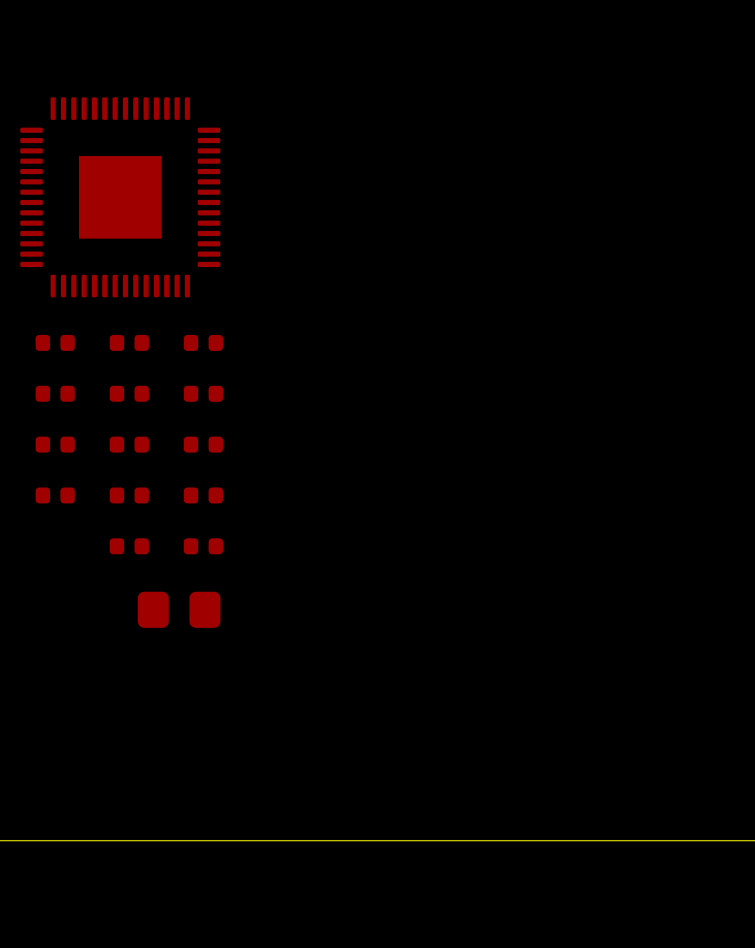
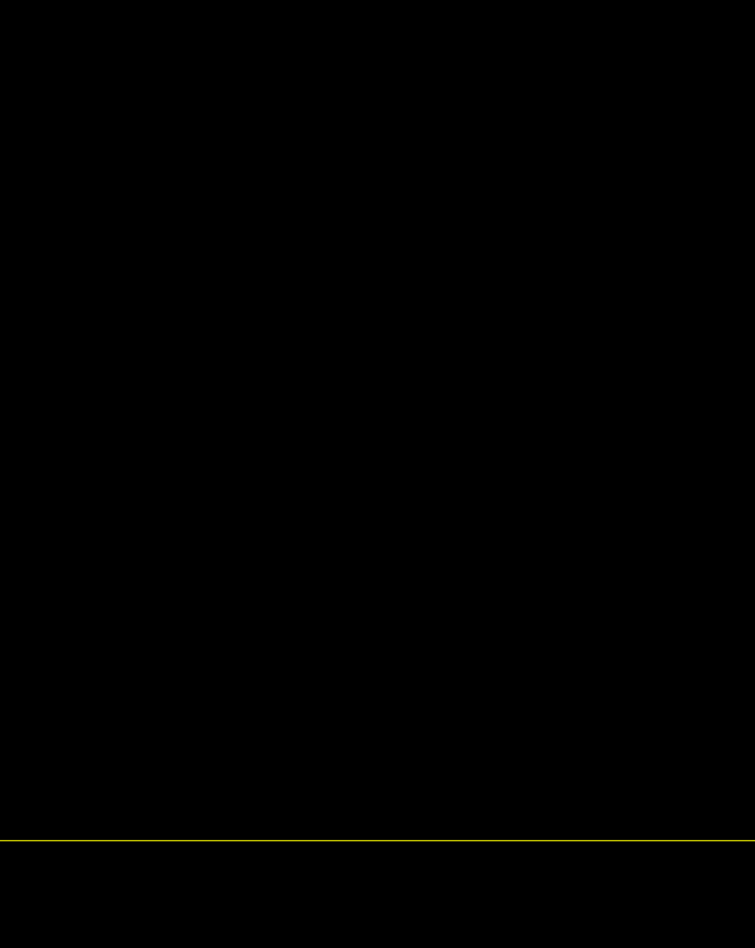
part: (120, 197) -> none
part: (55, 342) -> none
part: (129, 342) -> none
part: (203, 342) -> none
part: (55, 393) -> none
part: (129, 393) -> none
part: (203, 393) -> none
part: (55, 444) -> none
part: (129, 444) -> none
part: (203, 444) -> none
part: (55, 495) -> none
part: (129, 495) -> none
part: (203, 495) -> none
part: (129, 546) -> none
part: (203, 546) -> none
part: (179, 609) -> none

